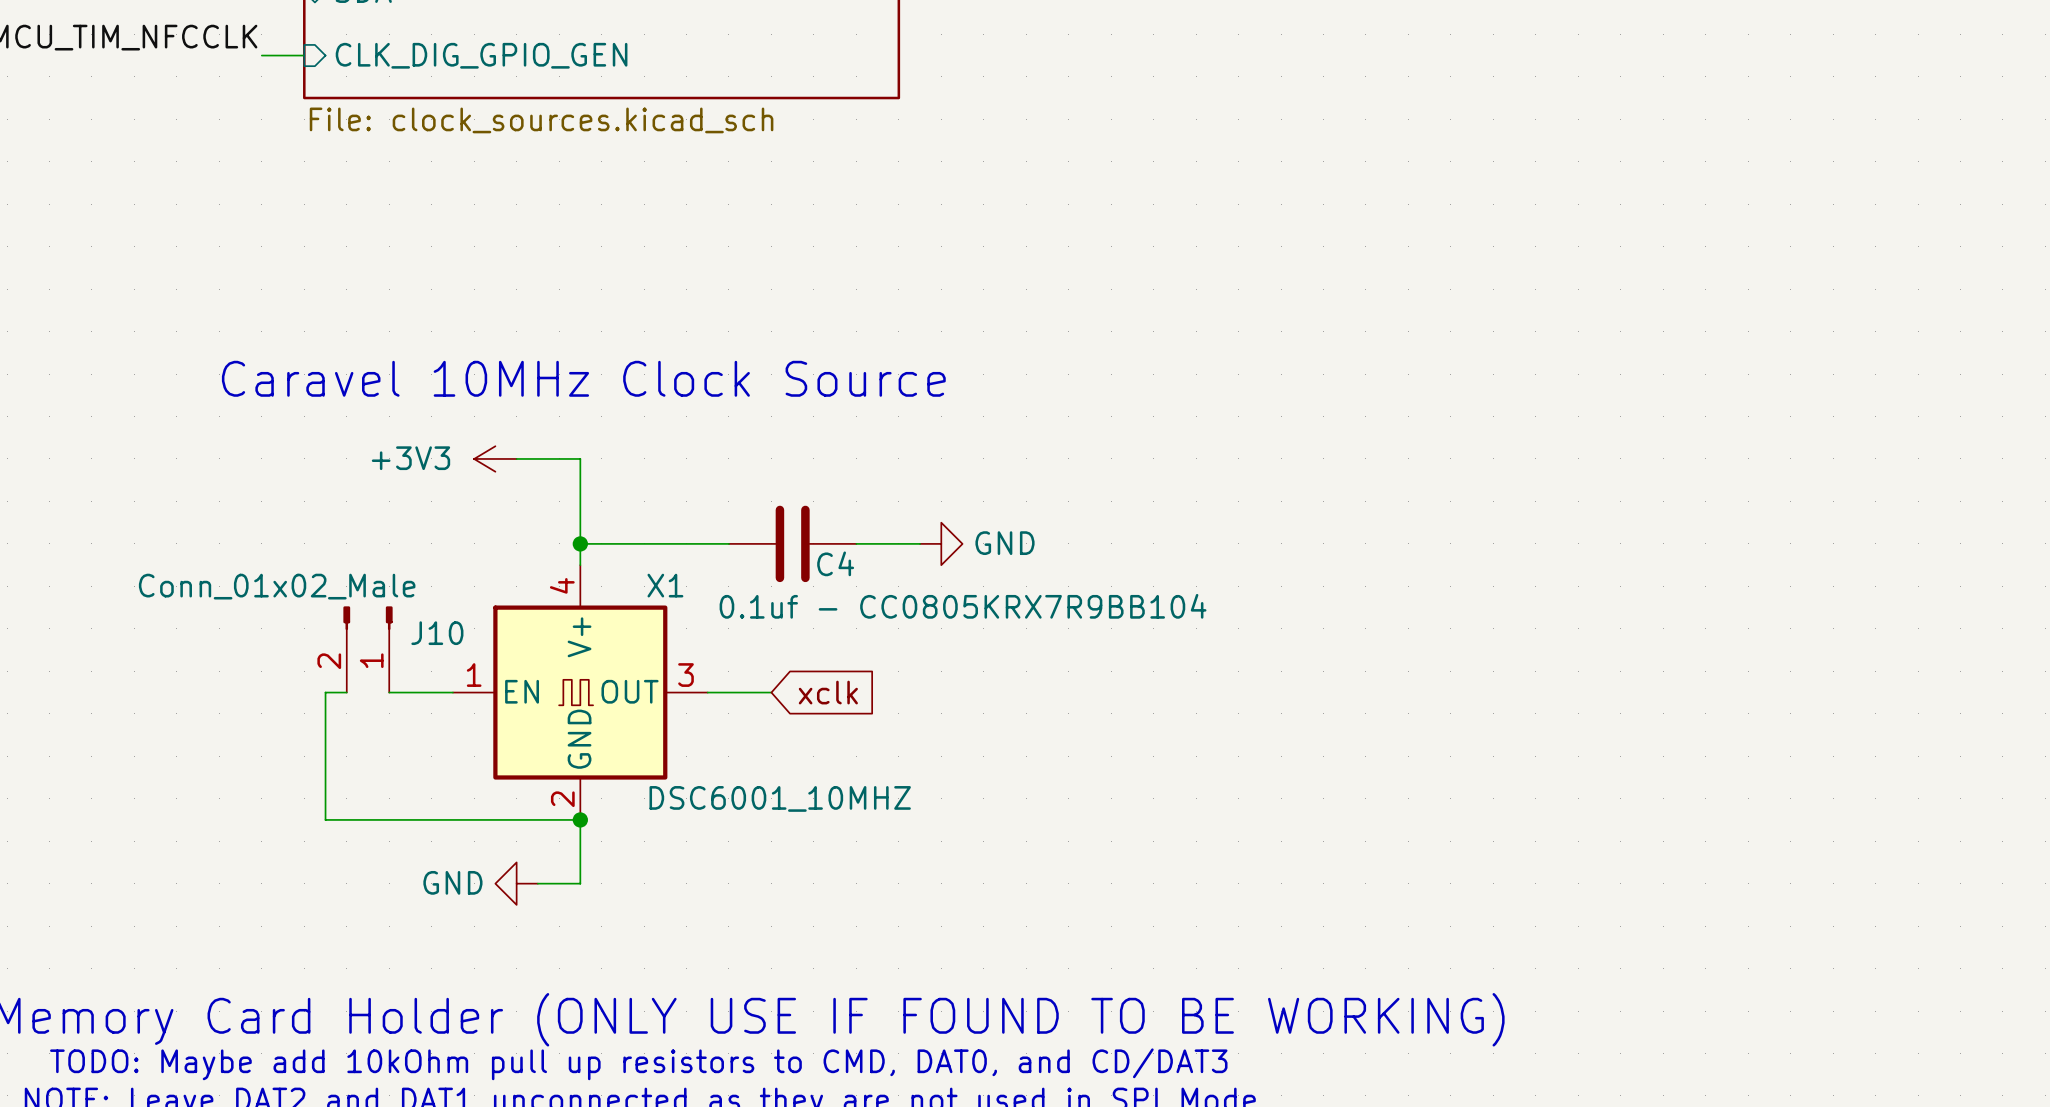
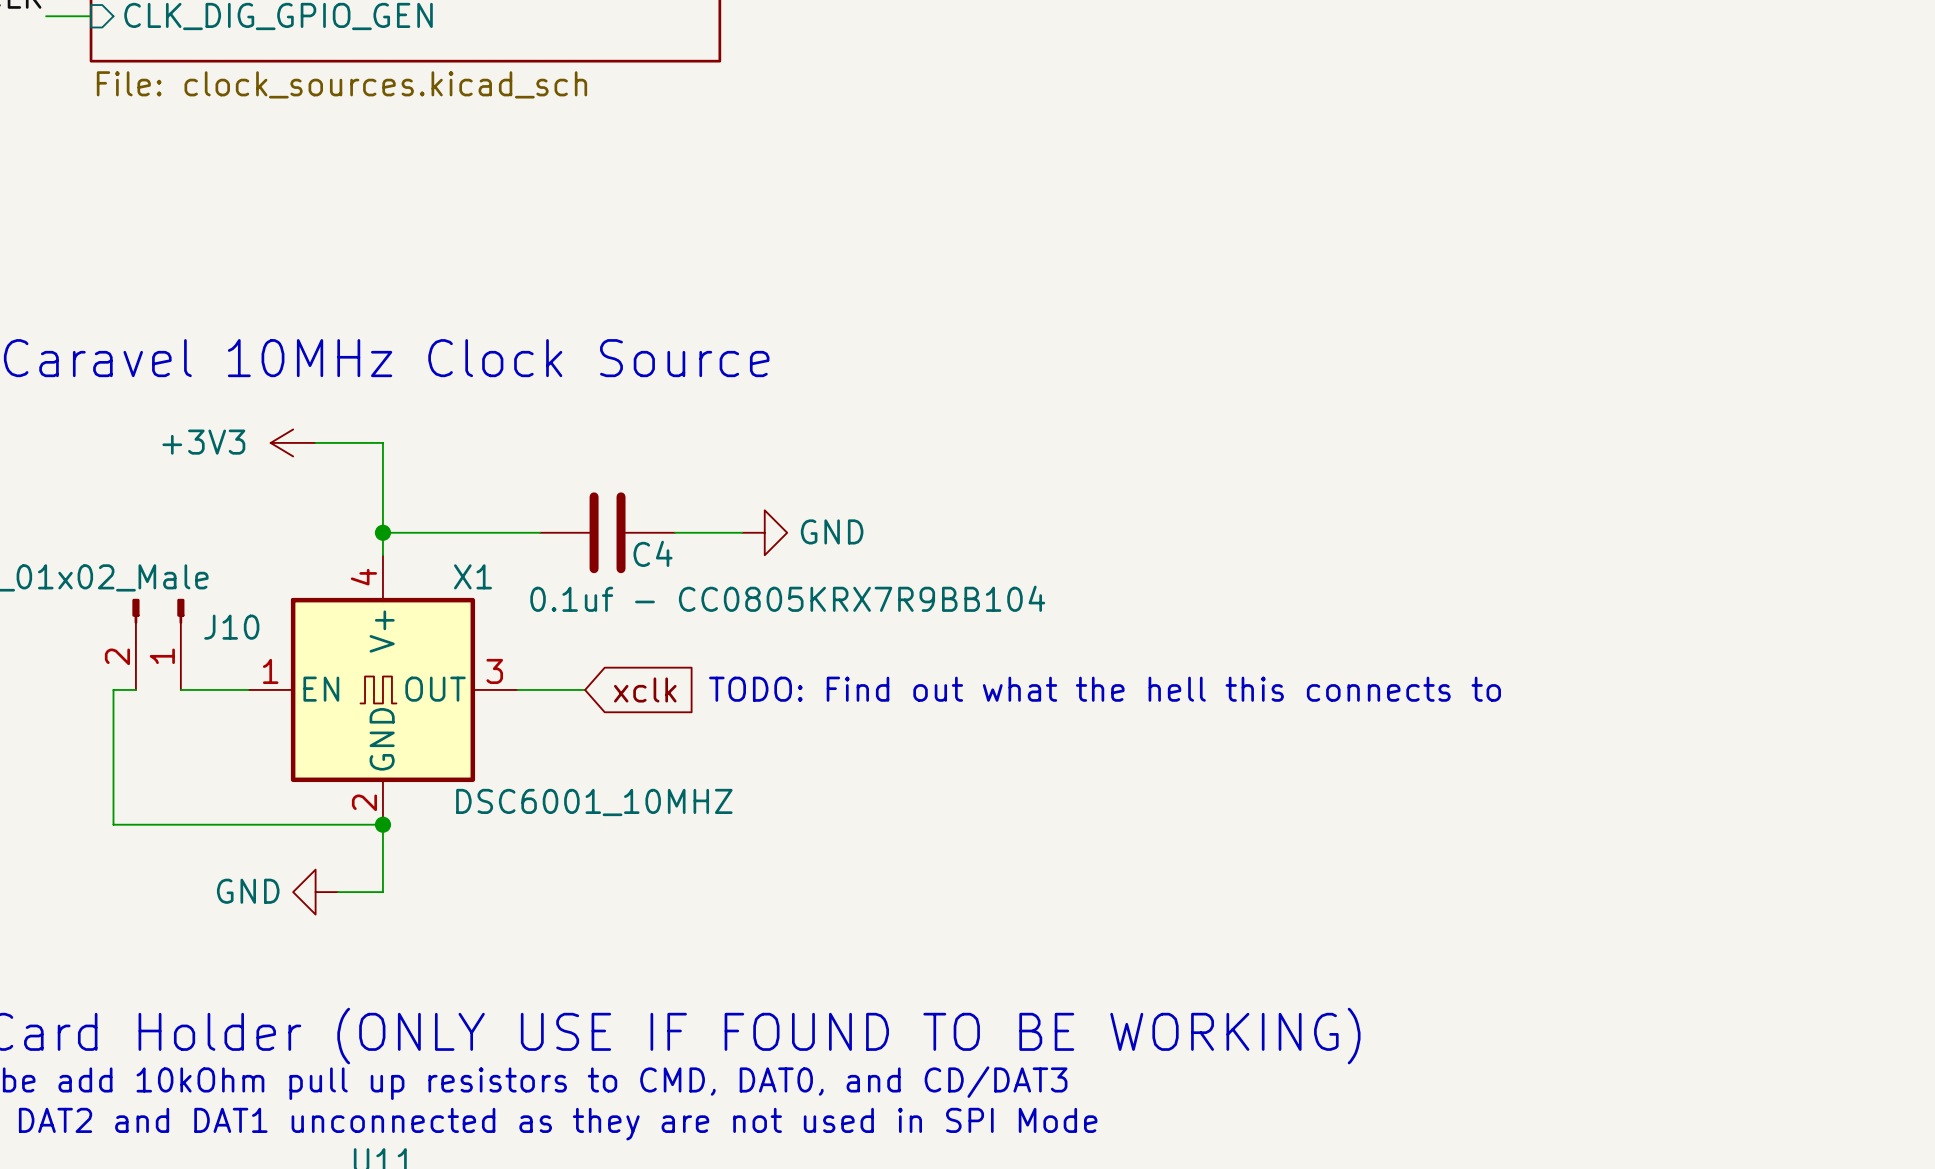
text: none -> TODO: Find out what the hell this connects to (1105, 689)

